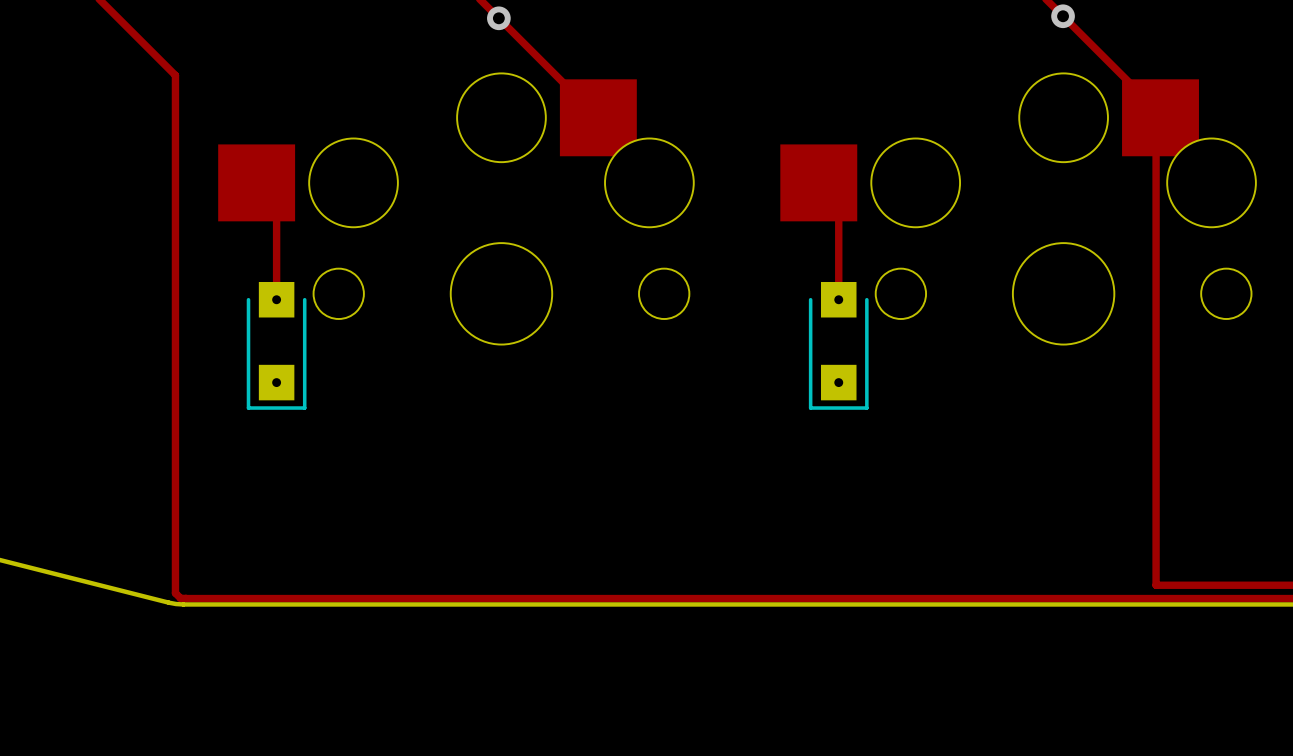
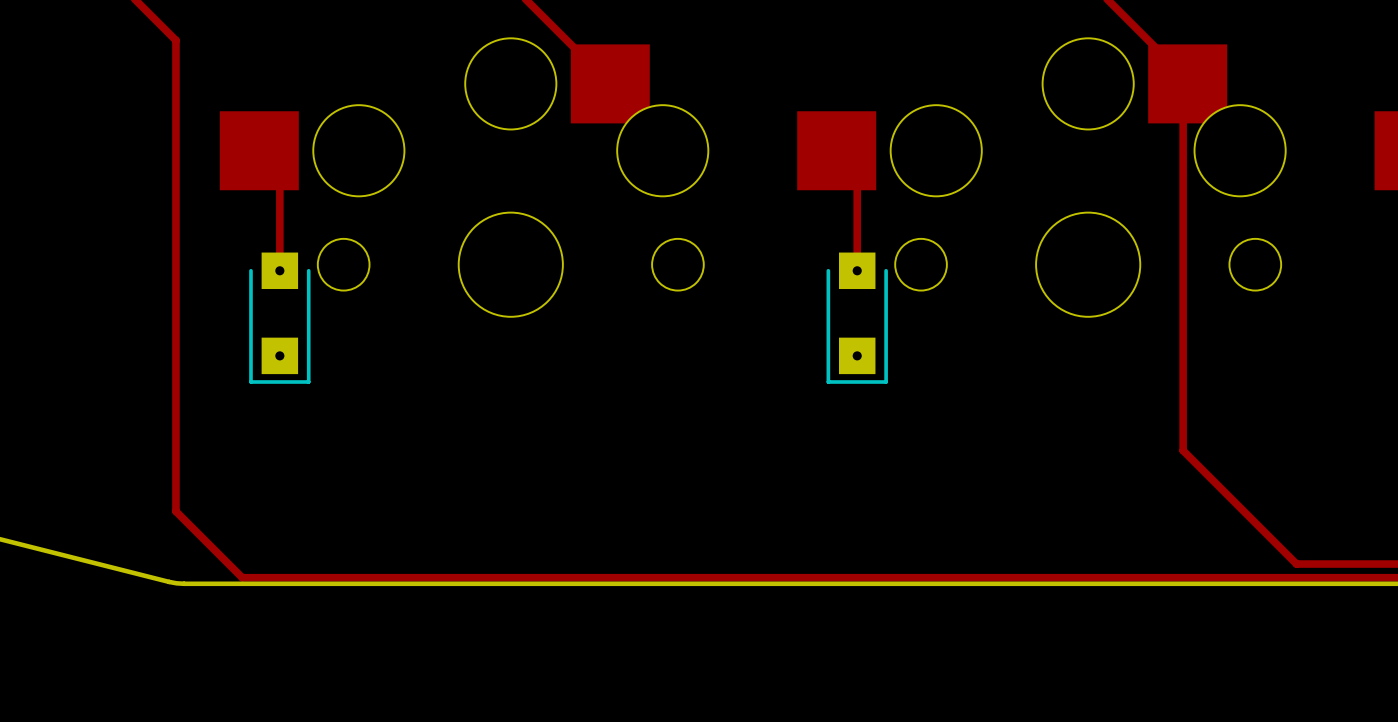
track: (1156, 474) (1156, 585) (1266, 585) -> (1183, 450) (1296, 564)
track: (175, 534) (175, 593) (180, 598) (240, 598) -> (175, 511) (242, 577)

